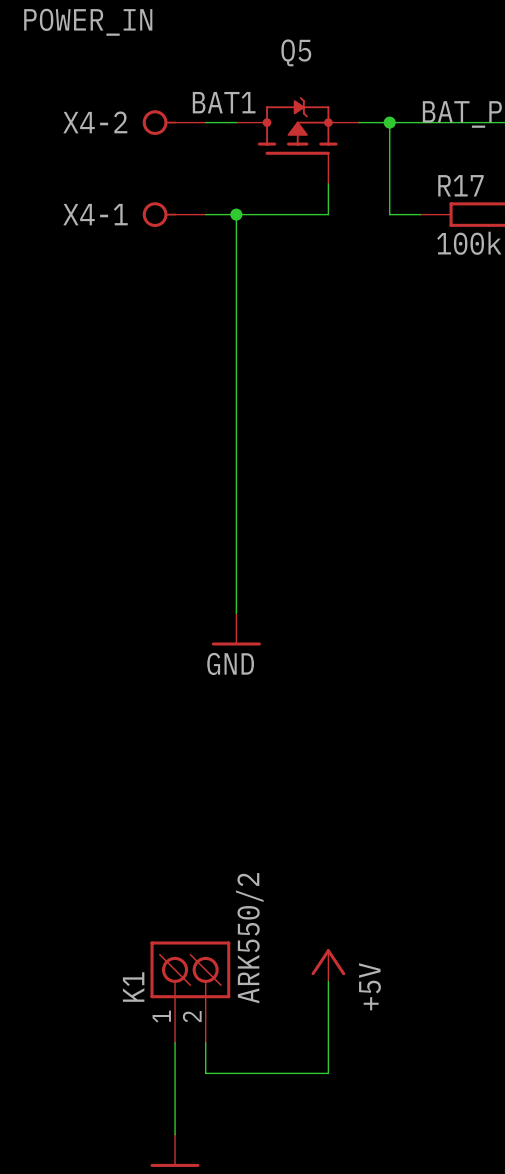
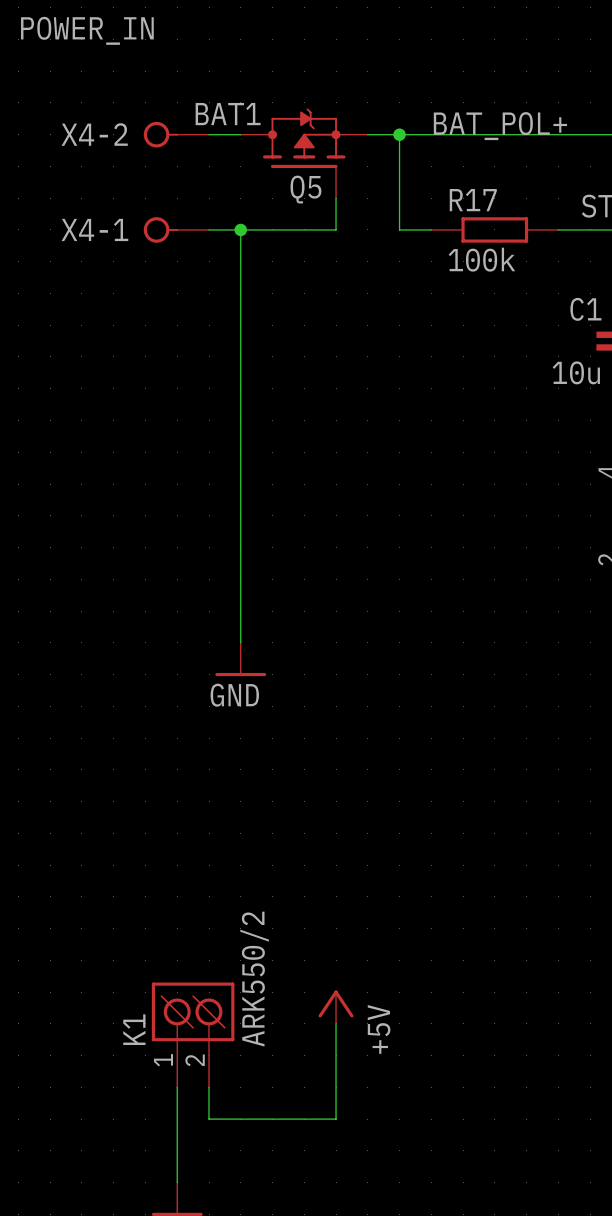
Q5 name position: Q5 (296, 52) -> Q5 (305, 189)

